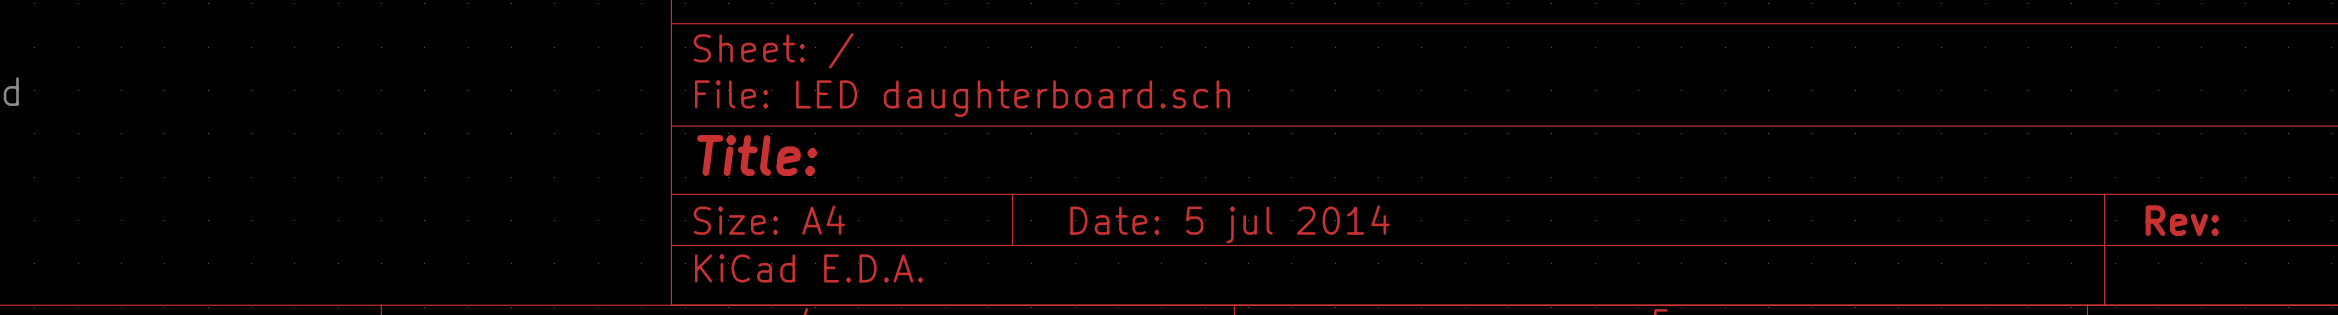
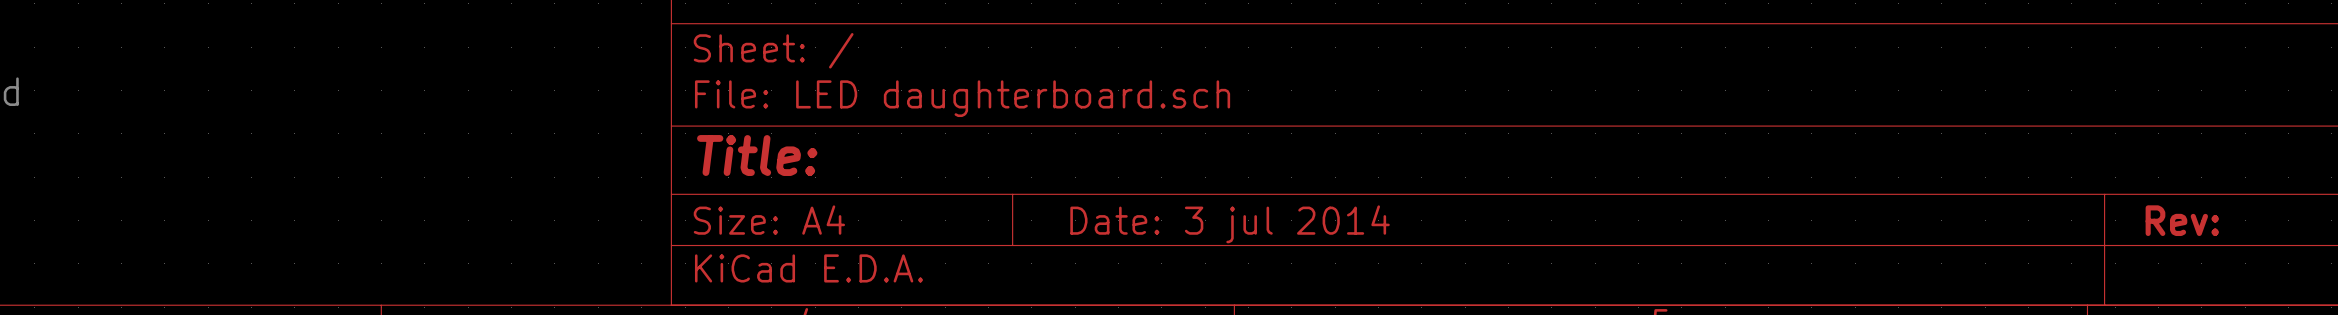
title block: Date: 5 jul 2014 (1230, 224) -> Date: 3 jul 2014 (1230, 224)

